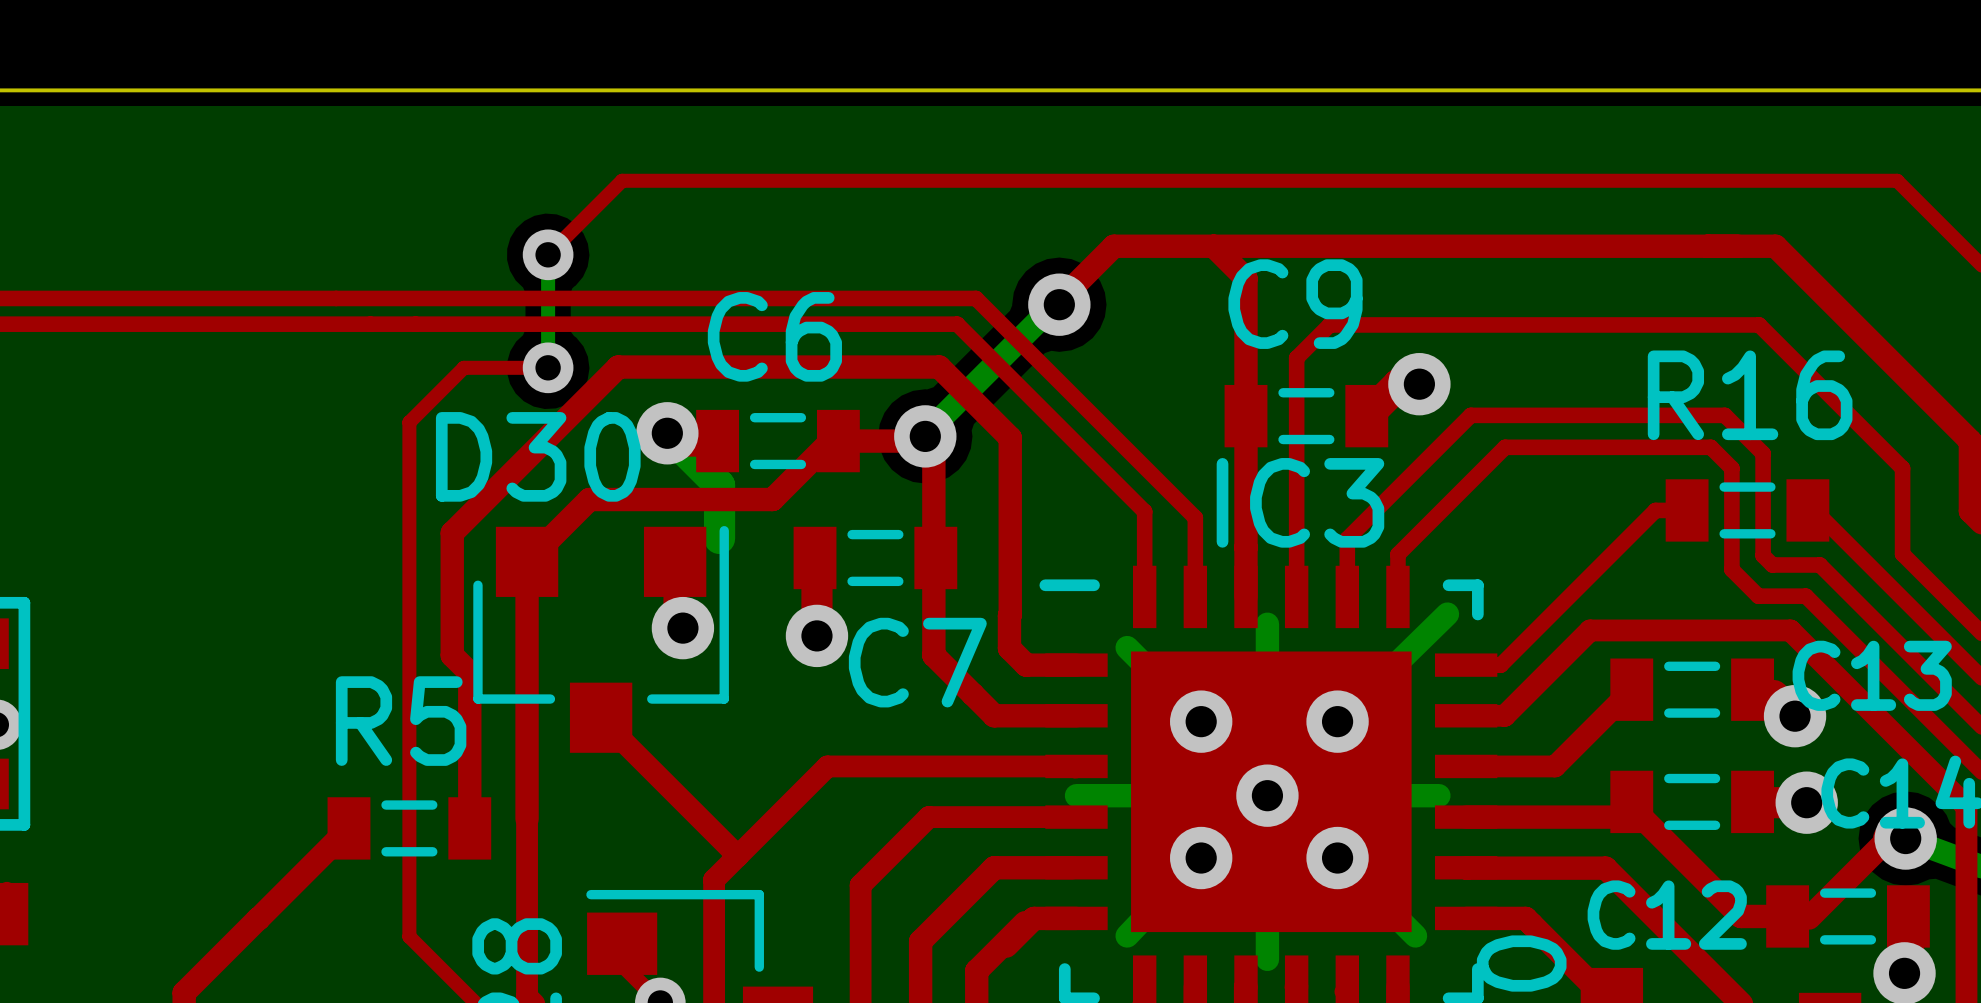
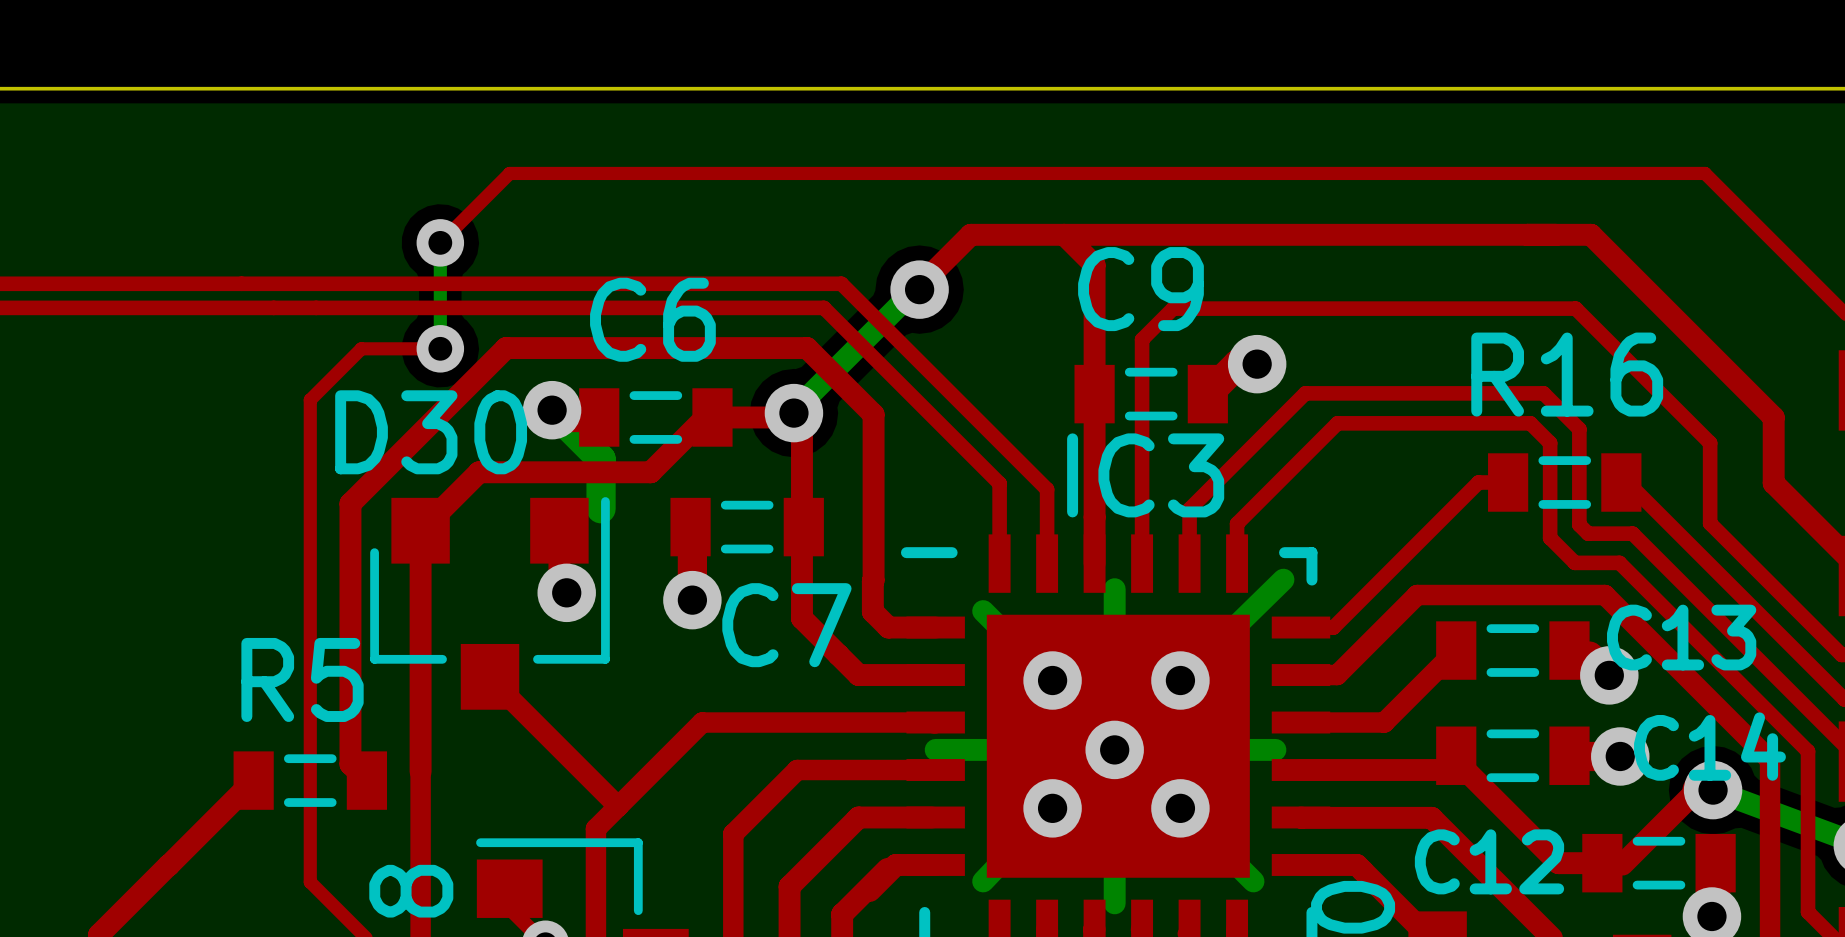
top track: (452, 655) (469, 672) (469, 828) -> (350, 618) (350, 764) (366, 780)

